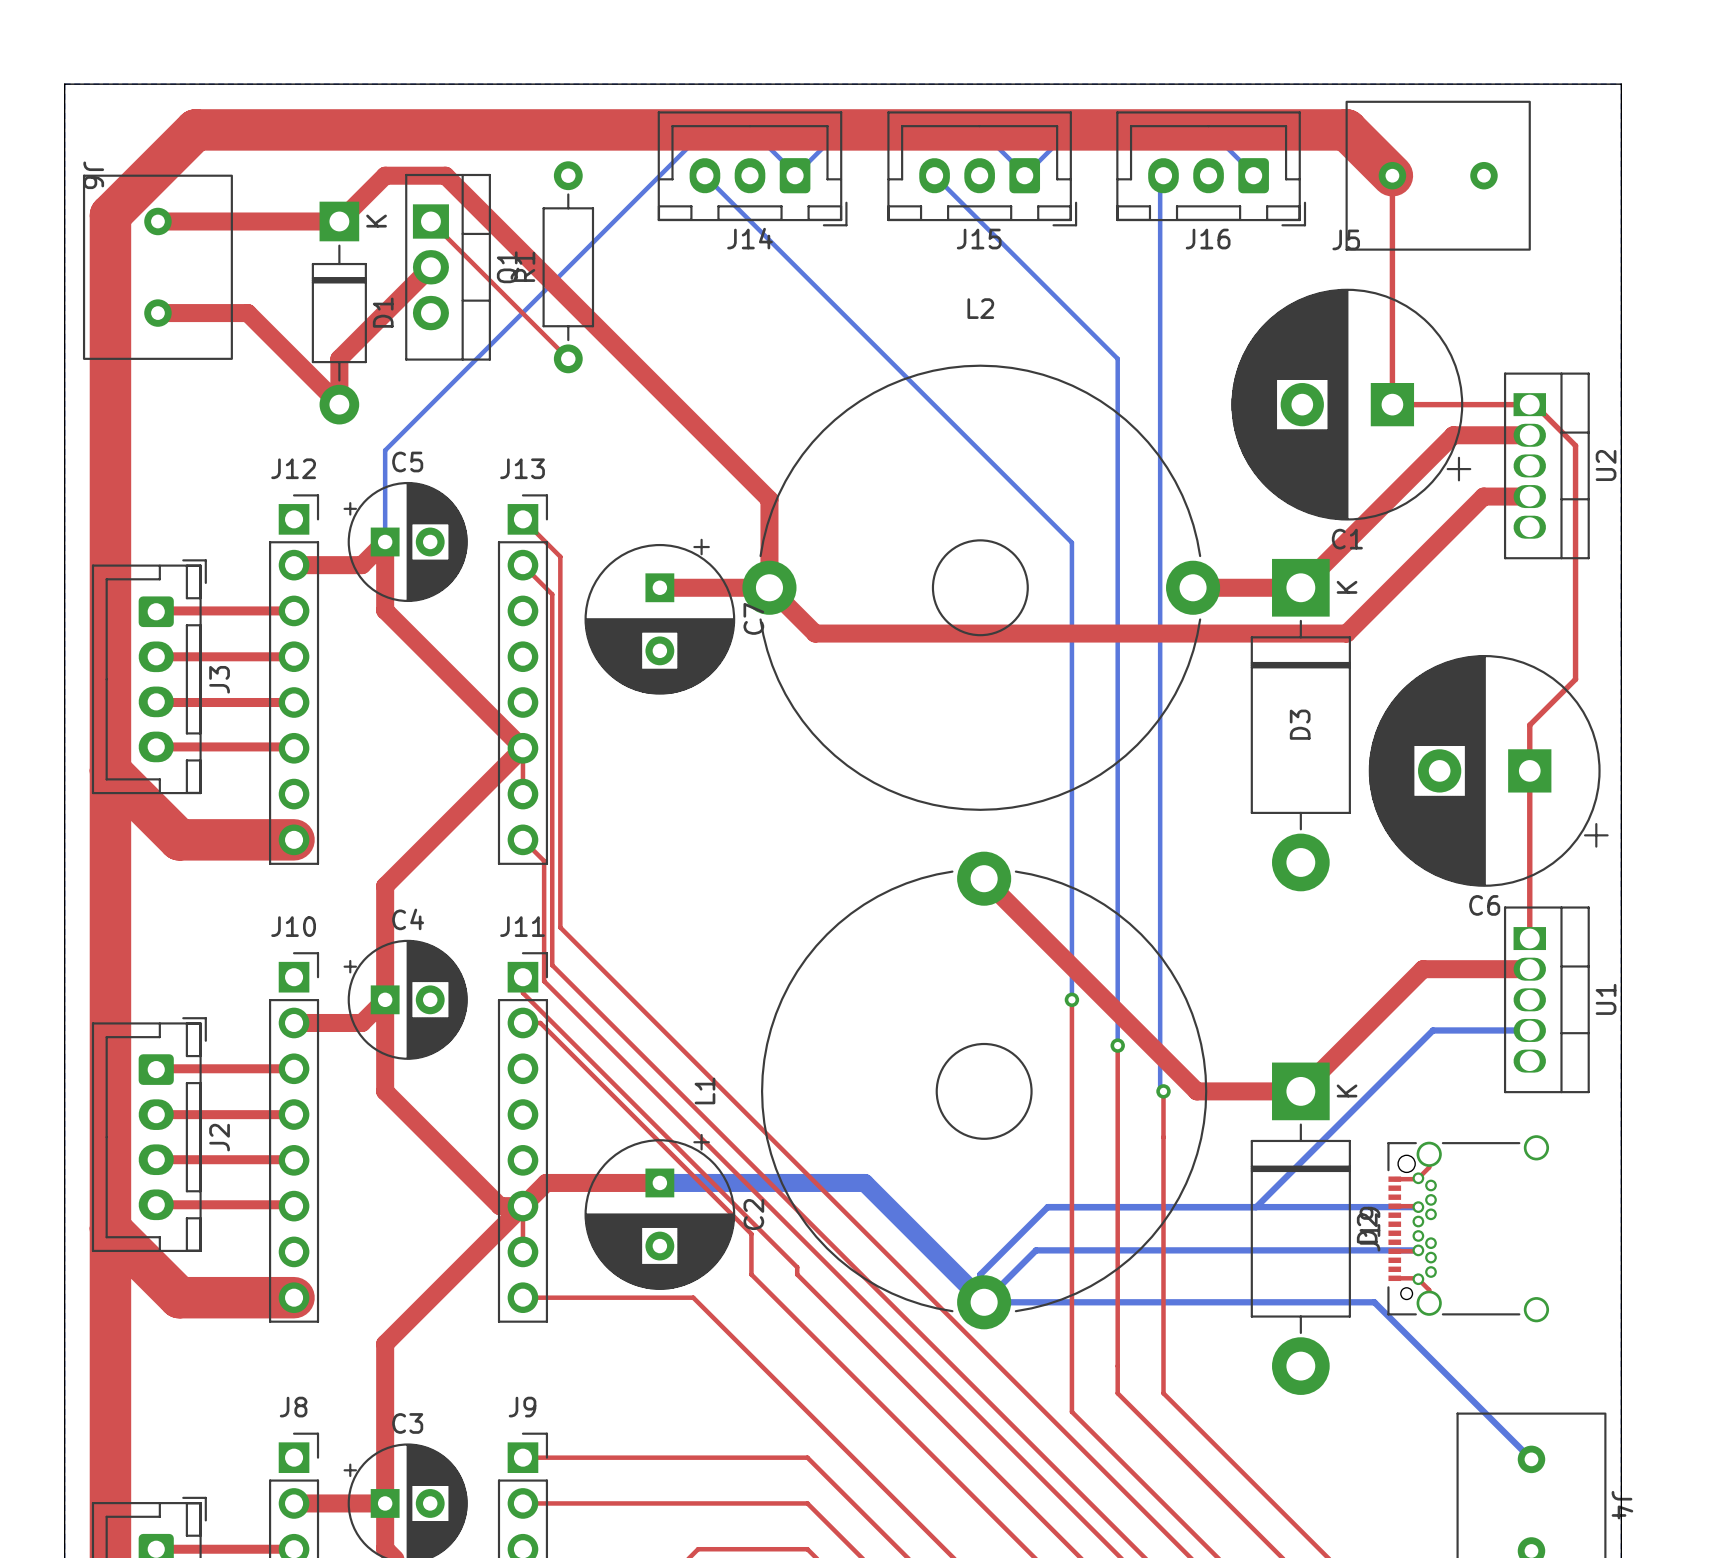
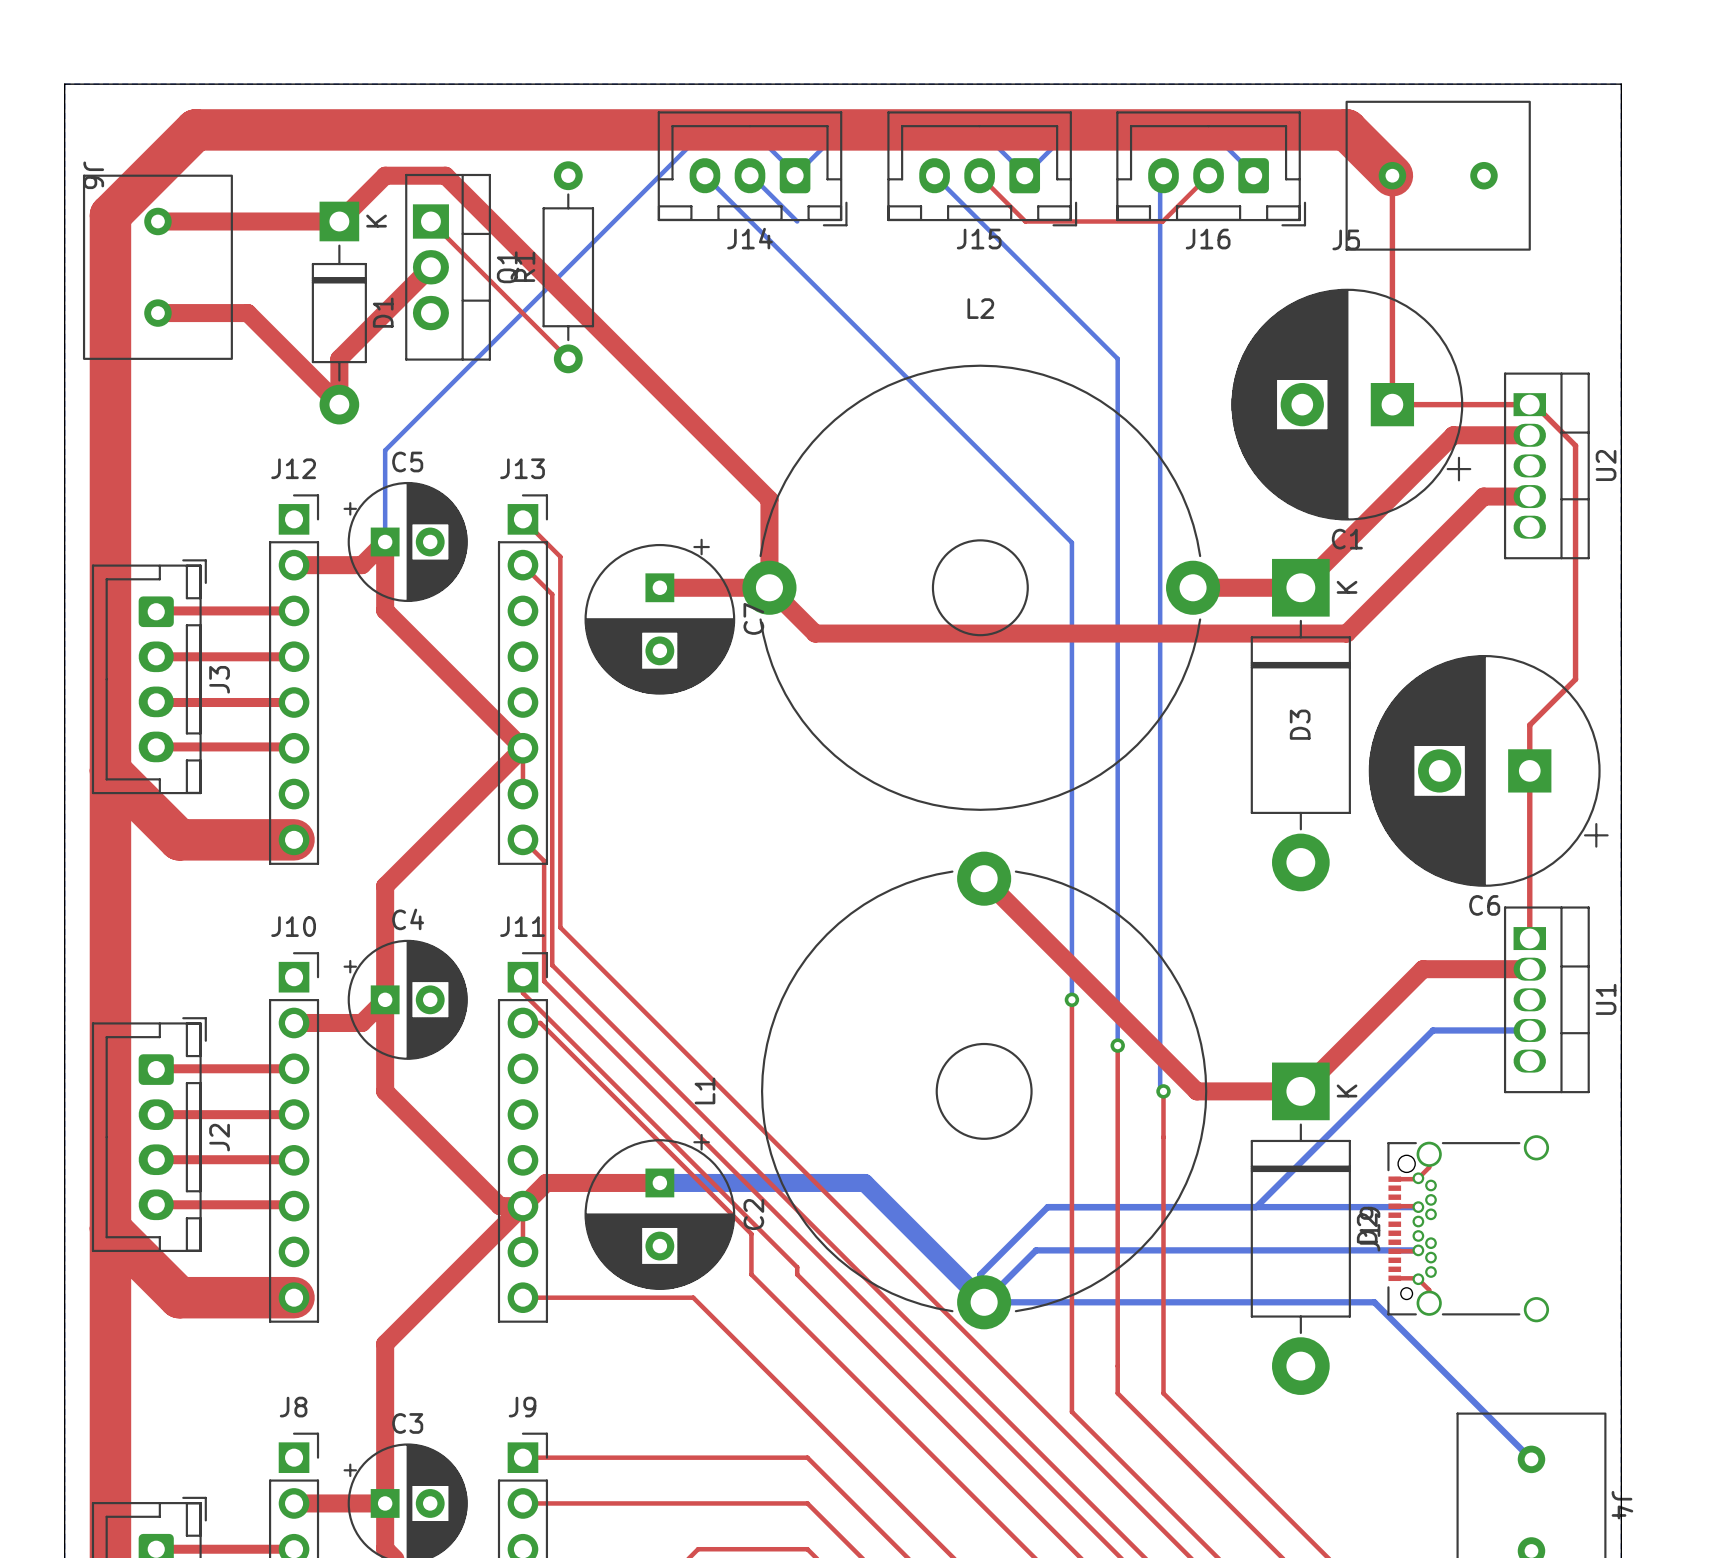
bottom track: none -> (749, 175) (797, 221)
top track: none -> (979, 175) (1025, 221) (1162, 221) (1208, 175)

